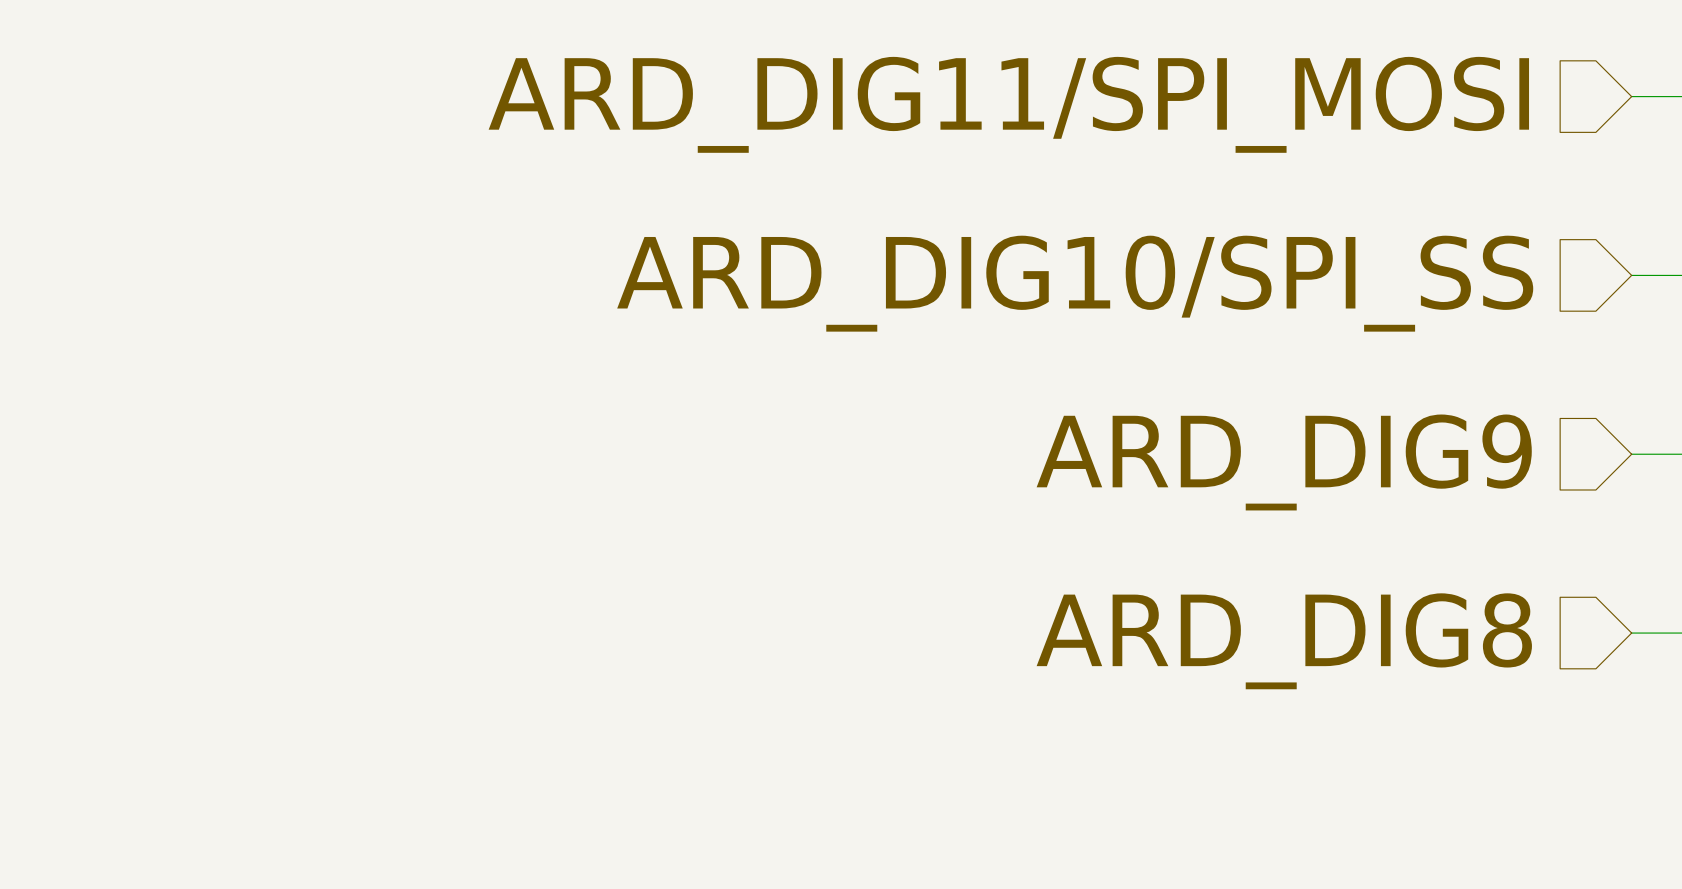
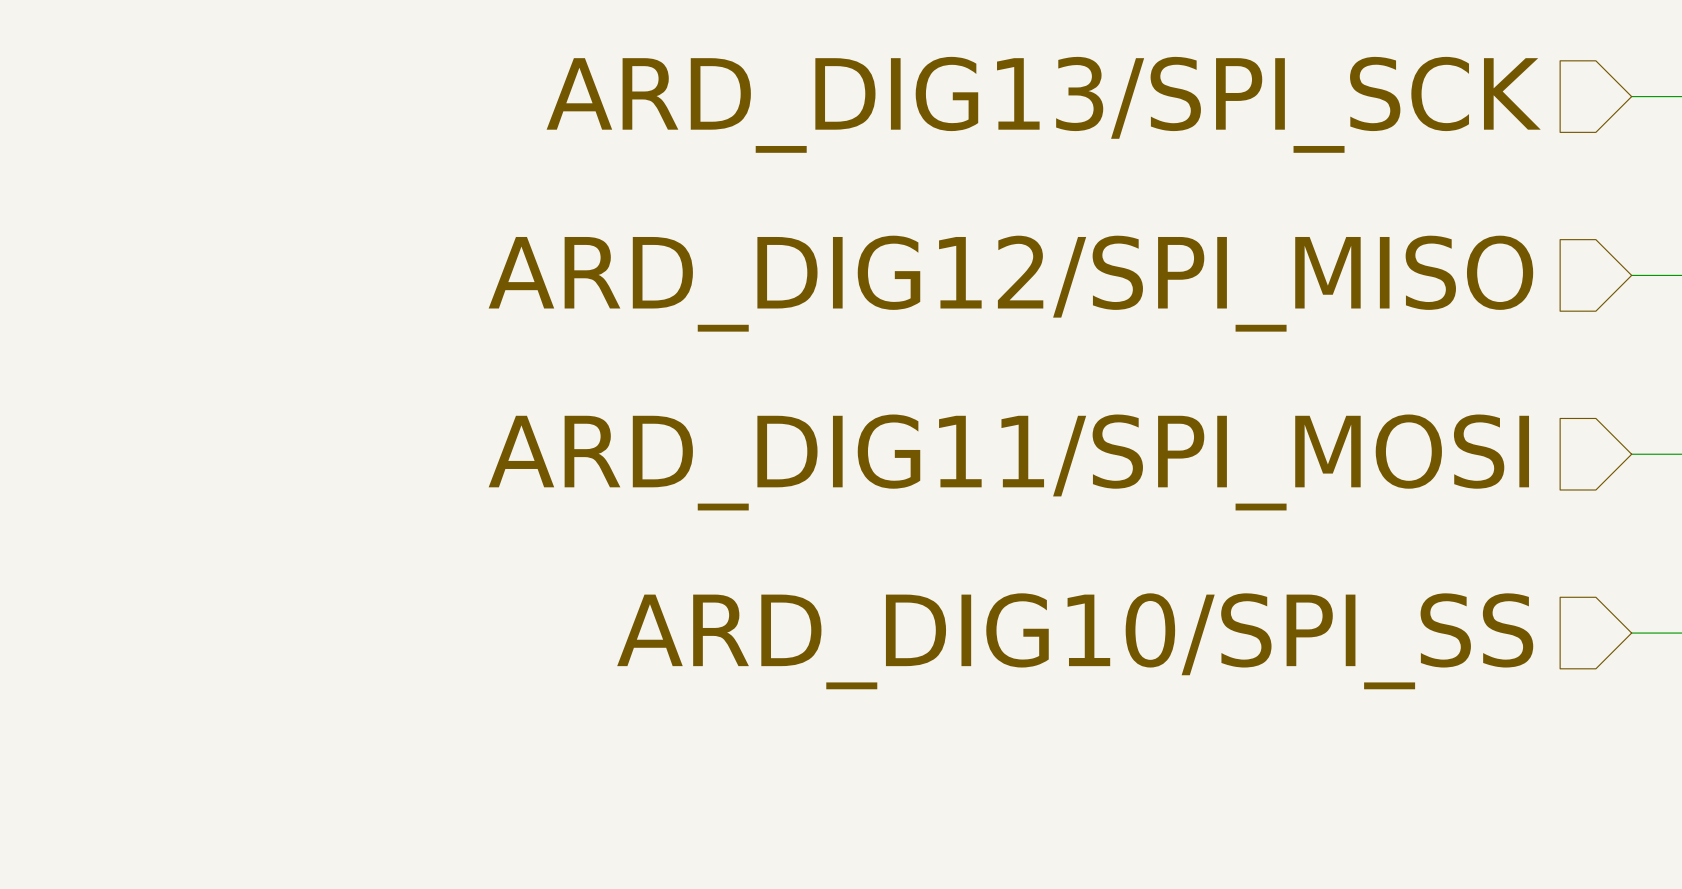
hierarchical label: ARD_DIG11/SPI_MOSI (1008, 104) -> ARD_DIG13/SPI_SCK (1043, 104)
hierarchical label: ARD_DIG10/SPI_SS (1075, 283) -> ARD_DIG12/SPI_MISO (1010, 283)
hierarchical label: ARD_DIG9 (1284, 462) -> ARD_DIG11/SPI_MOSI (1008, 462)
hierarchical label: ARD_DIG8 (1284, 641) -> ARD_DIG10/SPI_SS (1075, 641)

